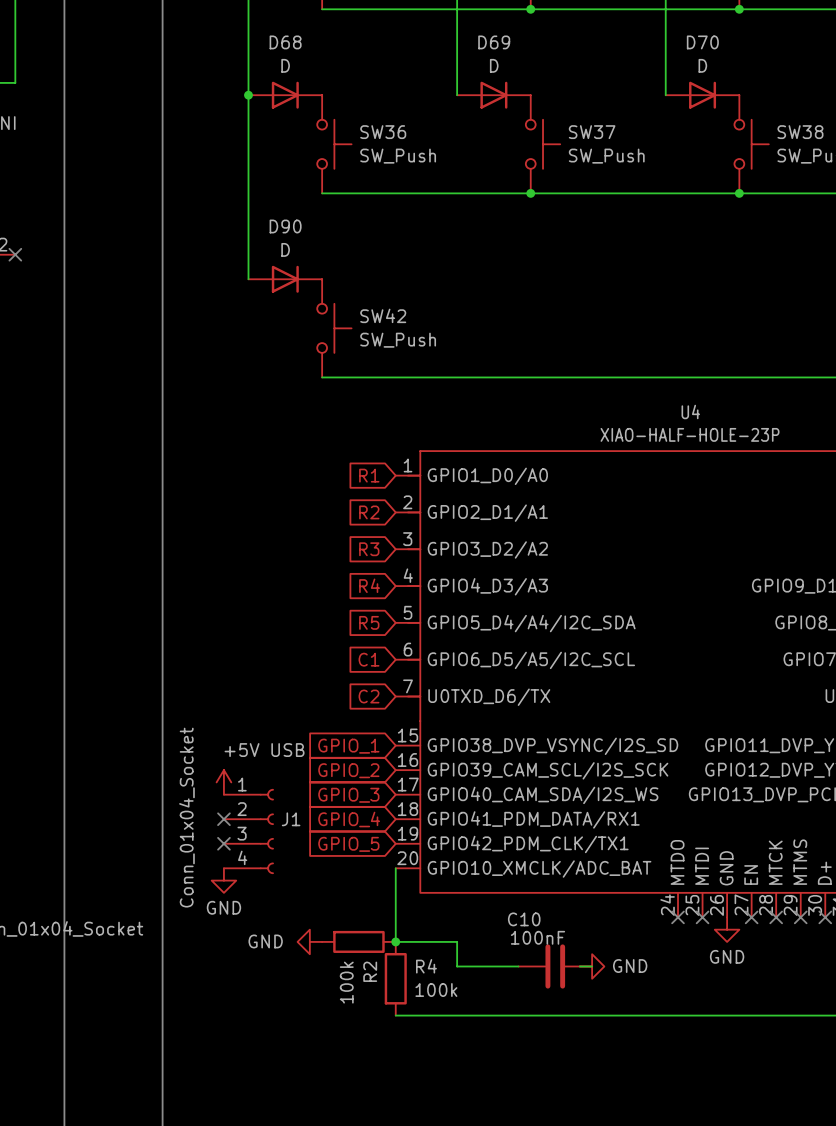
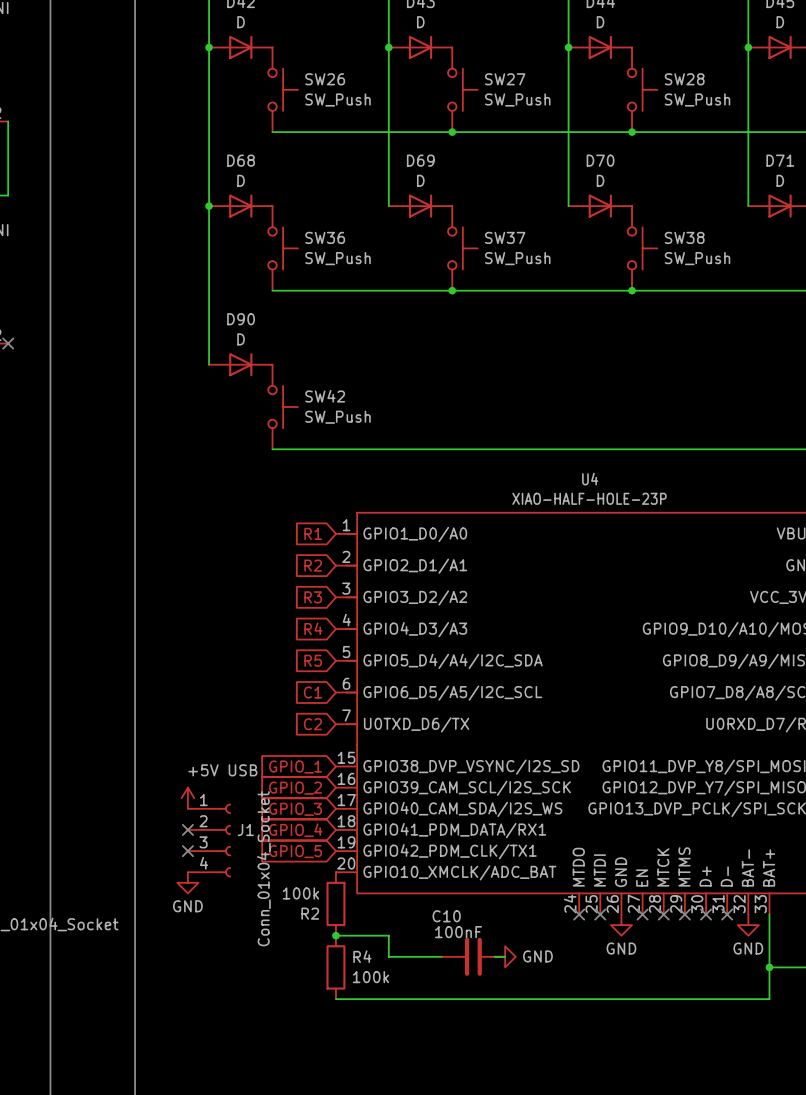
J1 value position: Conn_01x04_Socket (186, 817) -> Conn_01x04_Socket (263, 868)
wire: (395, 868) (395, 941) -> none
power symbol: GND (309, 941) -> none
R2 rotation: 0° (358, 941) -> 90° clockwise (335, 903)
R2 position: (358, 941) -> (335, 903)

